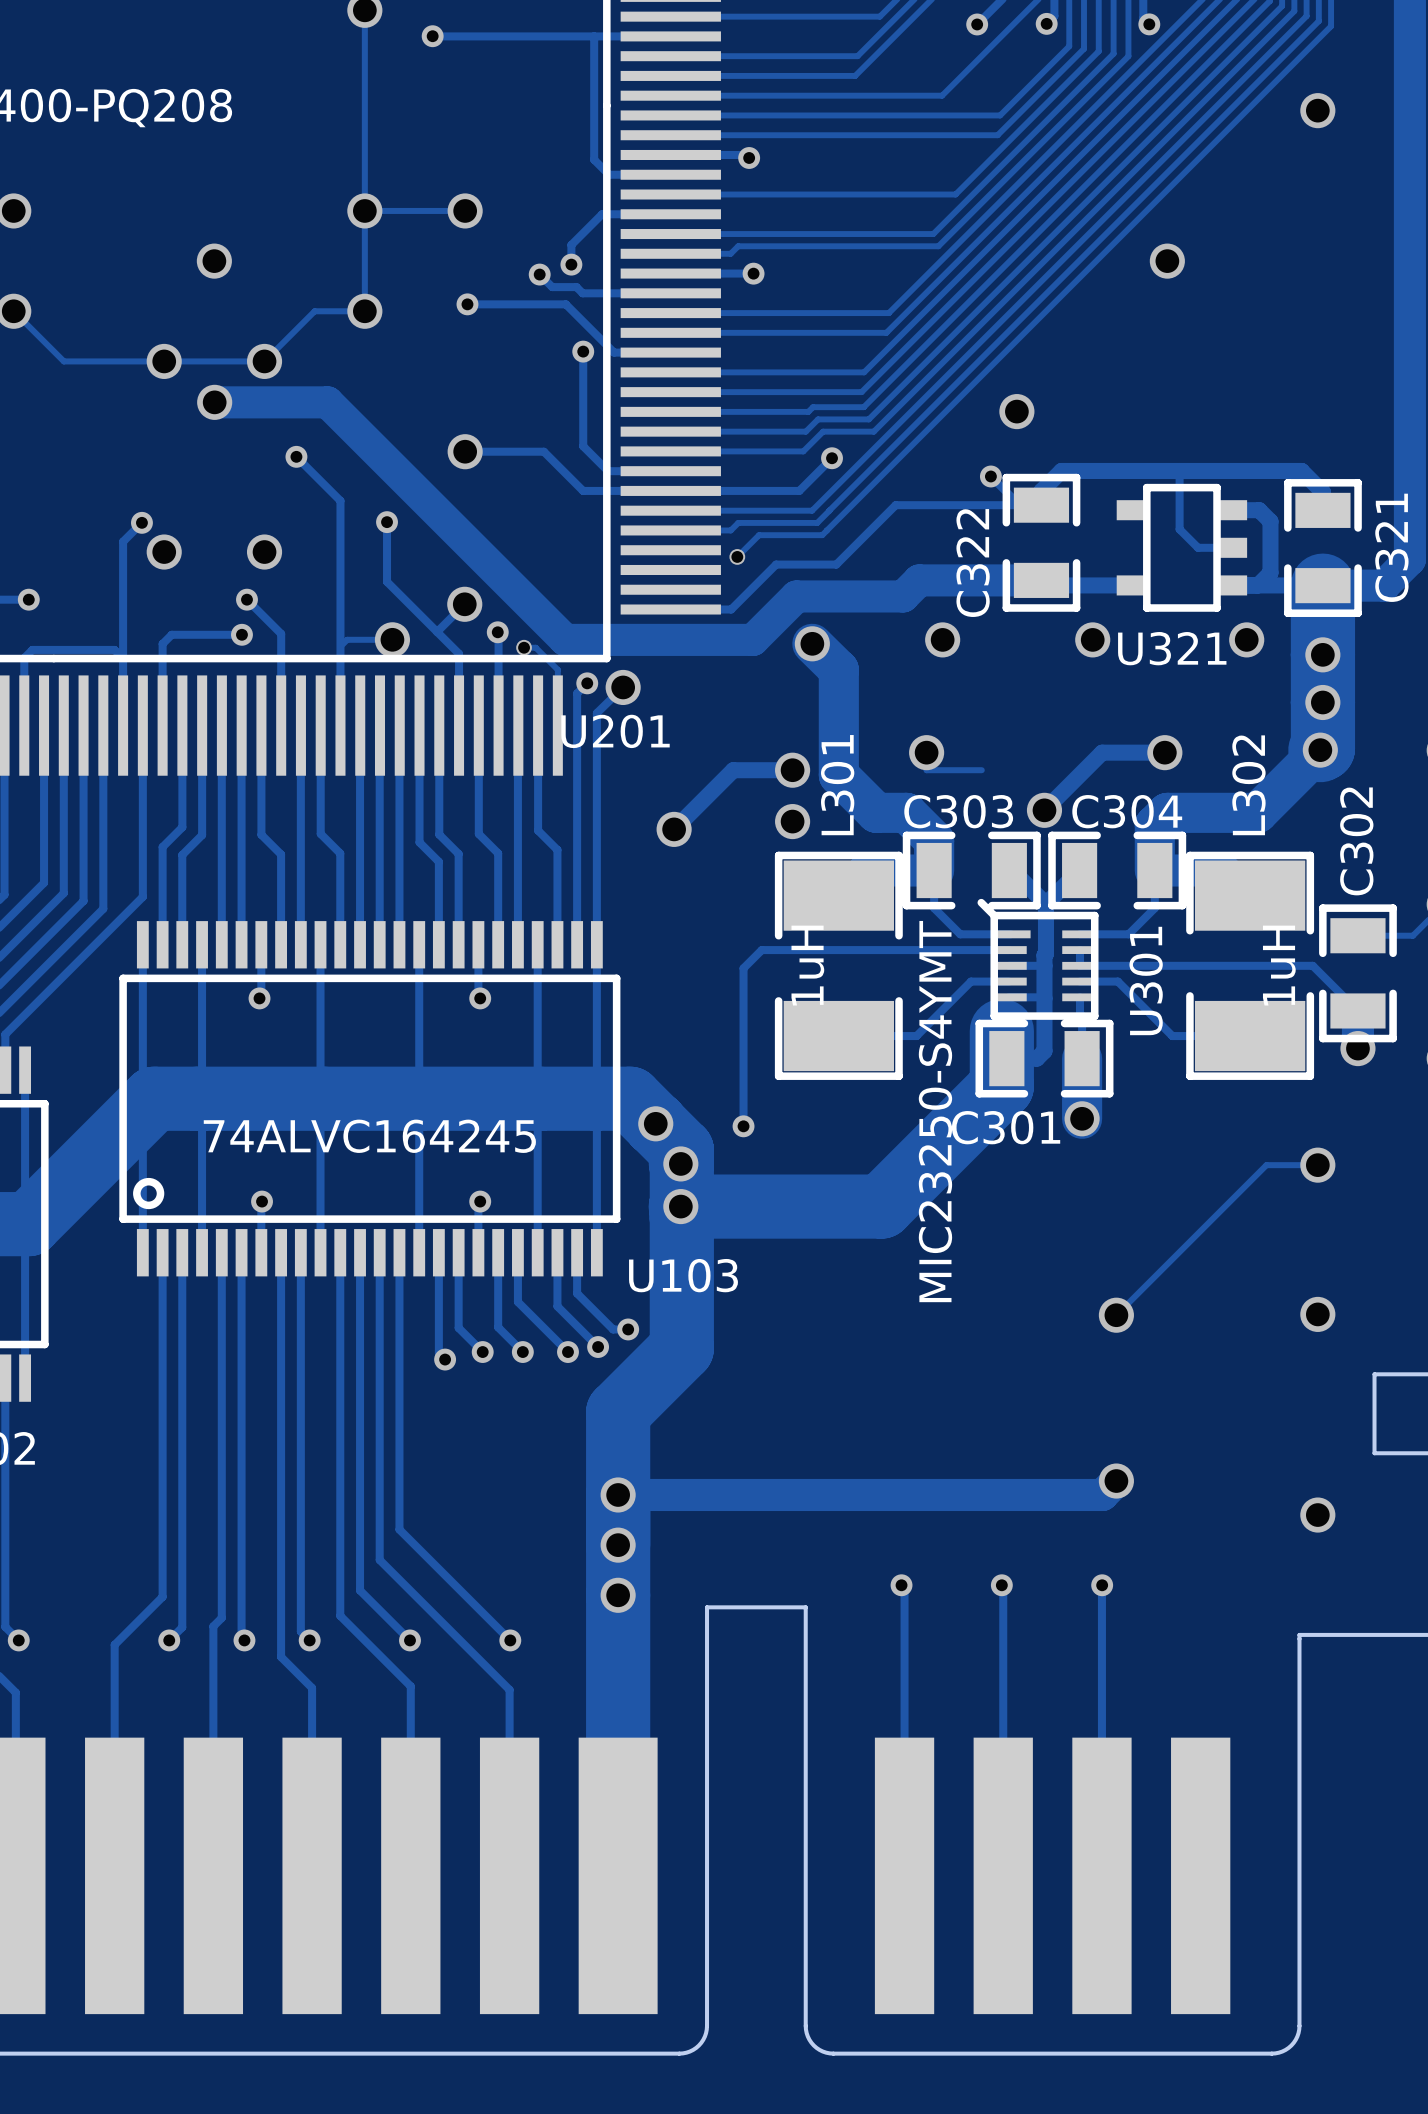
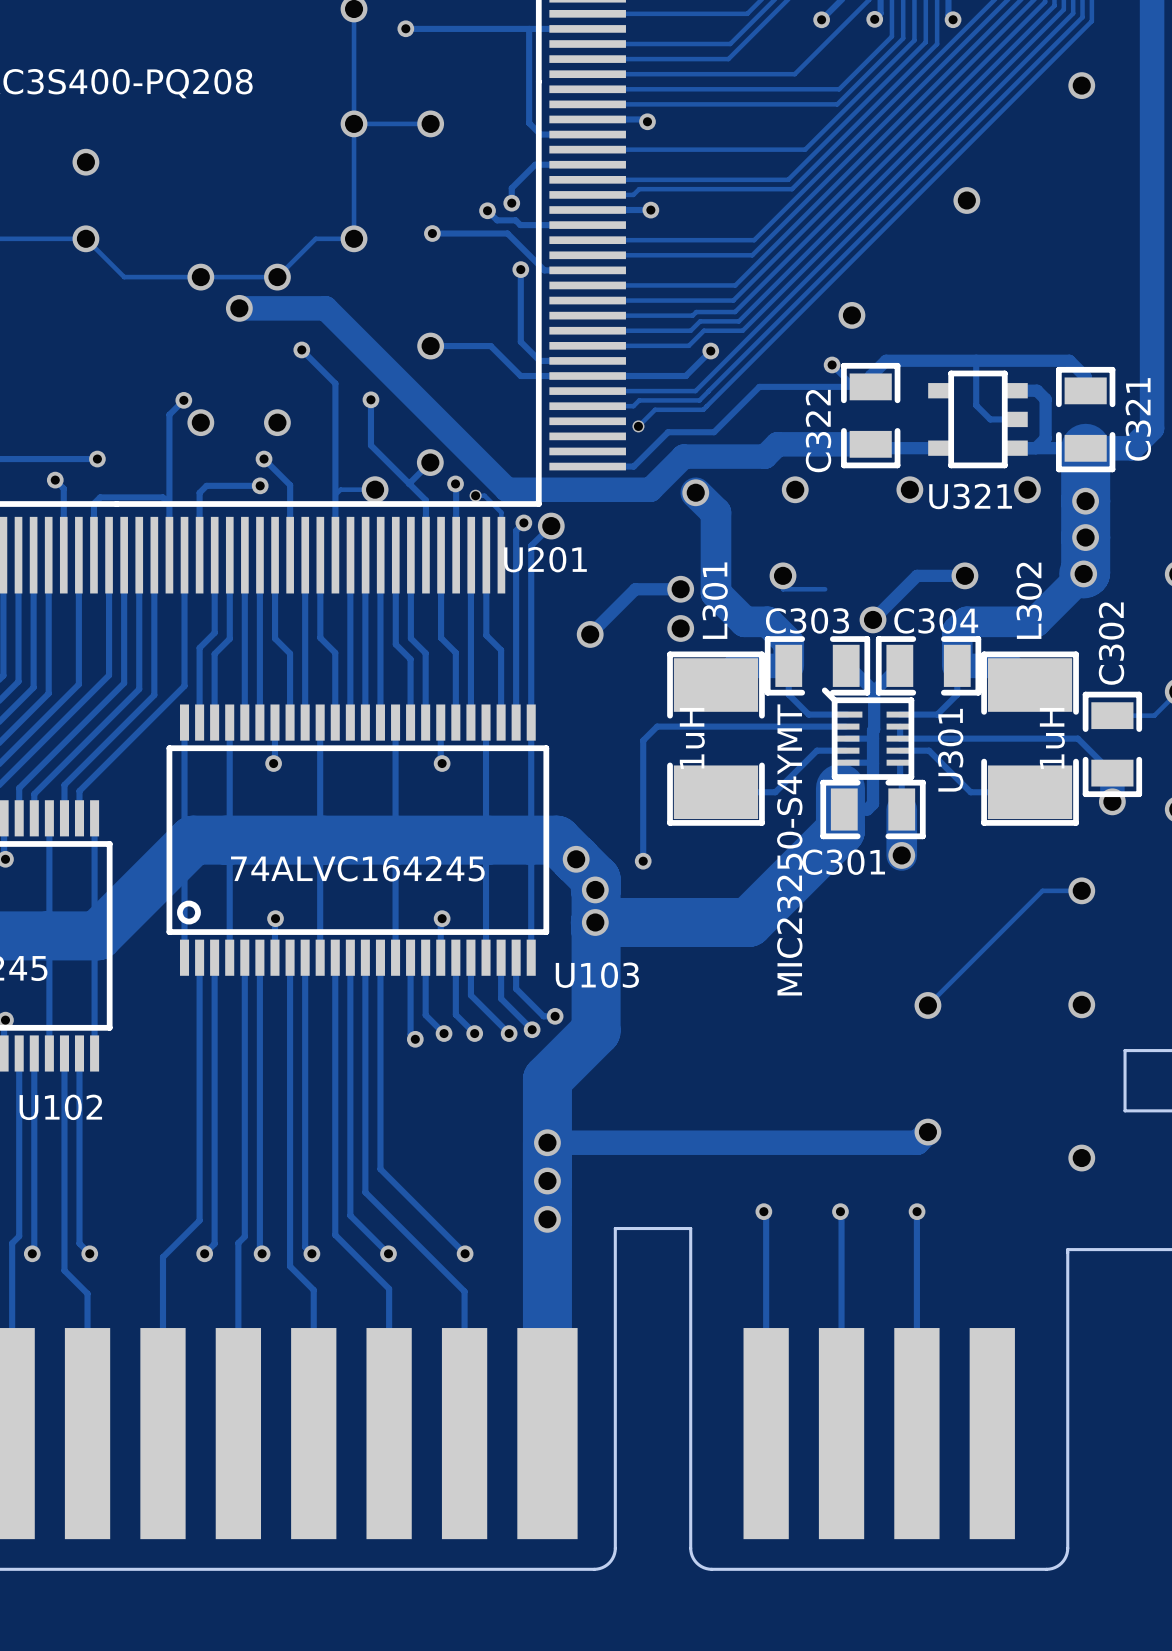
track: (364, 210) (465, 210) -> (354, 123) (430, 123)
via position: (364, 210) -> (354, 123)
via position: (465, 210) -> (430, 123)
via: (214, 261) -> none

